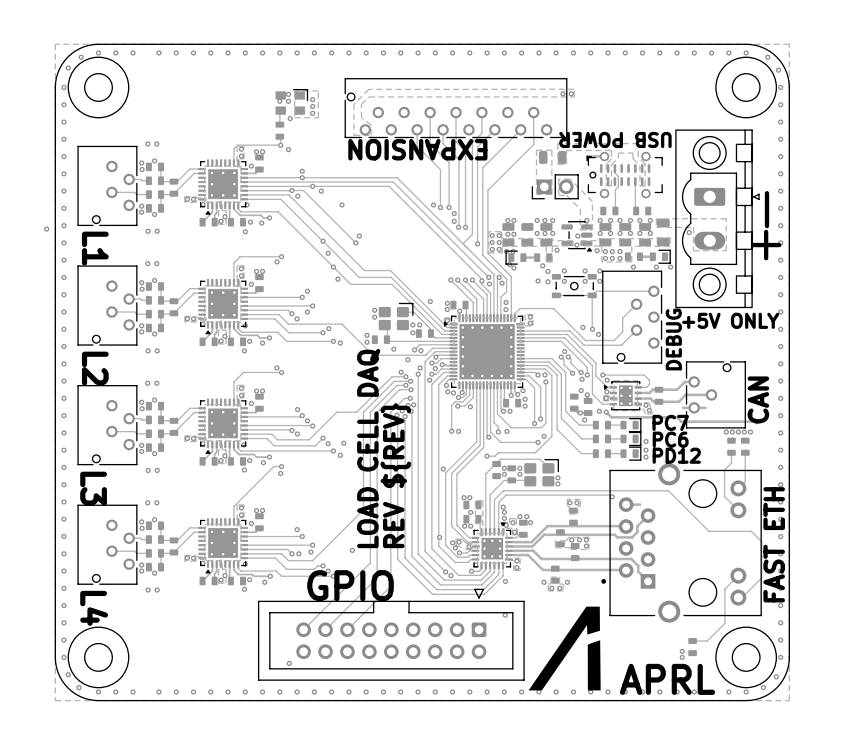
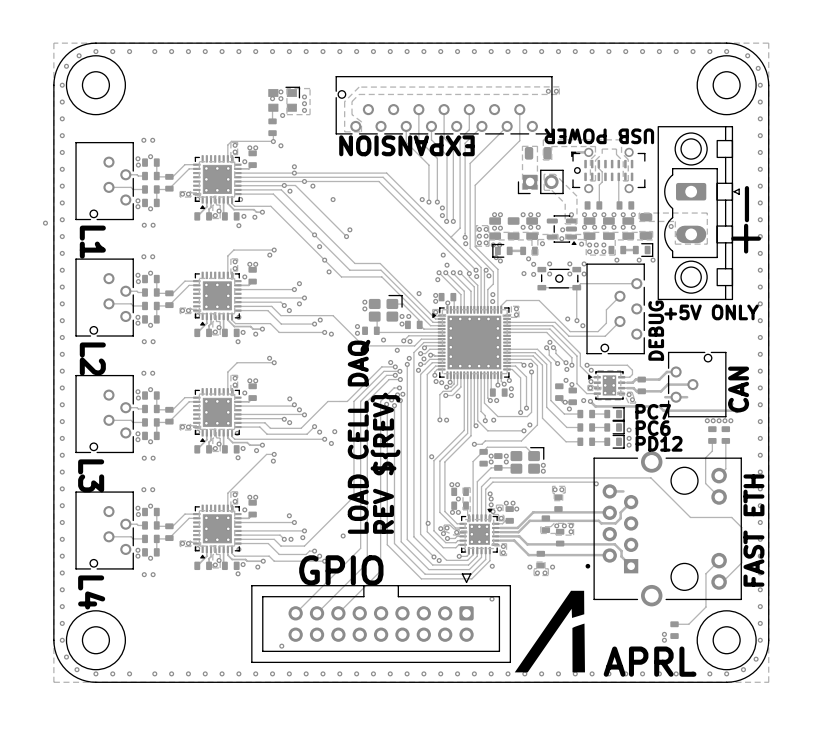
via: none -> (465, 243)
via: none -> (443, 255)
via: none -> (447, 265)
via: none -> (437, 279)

